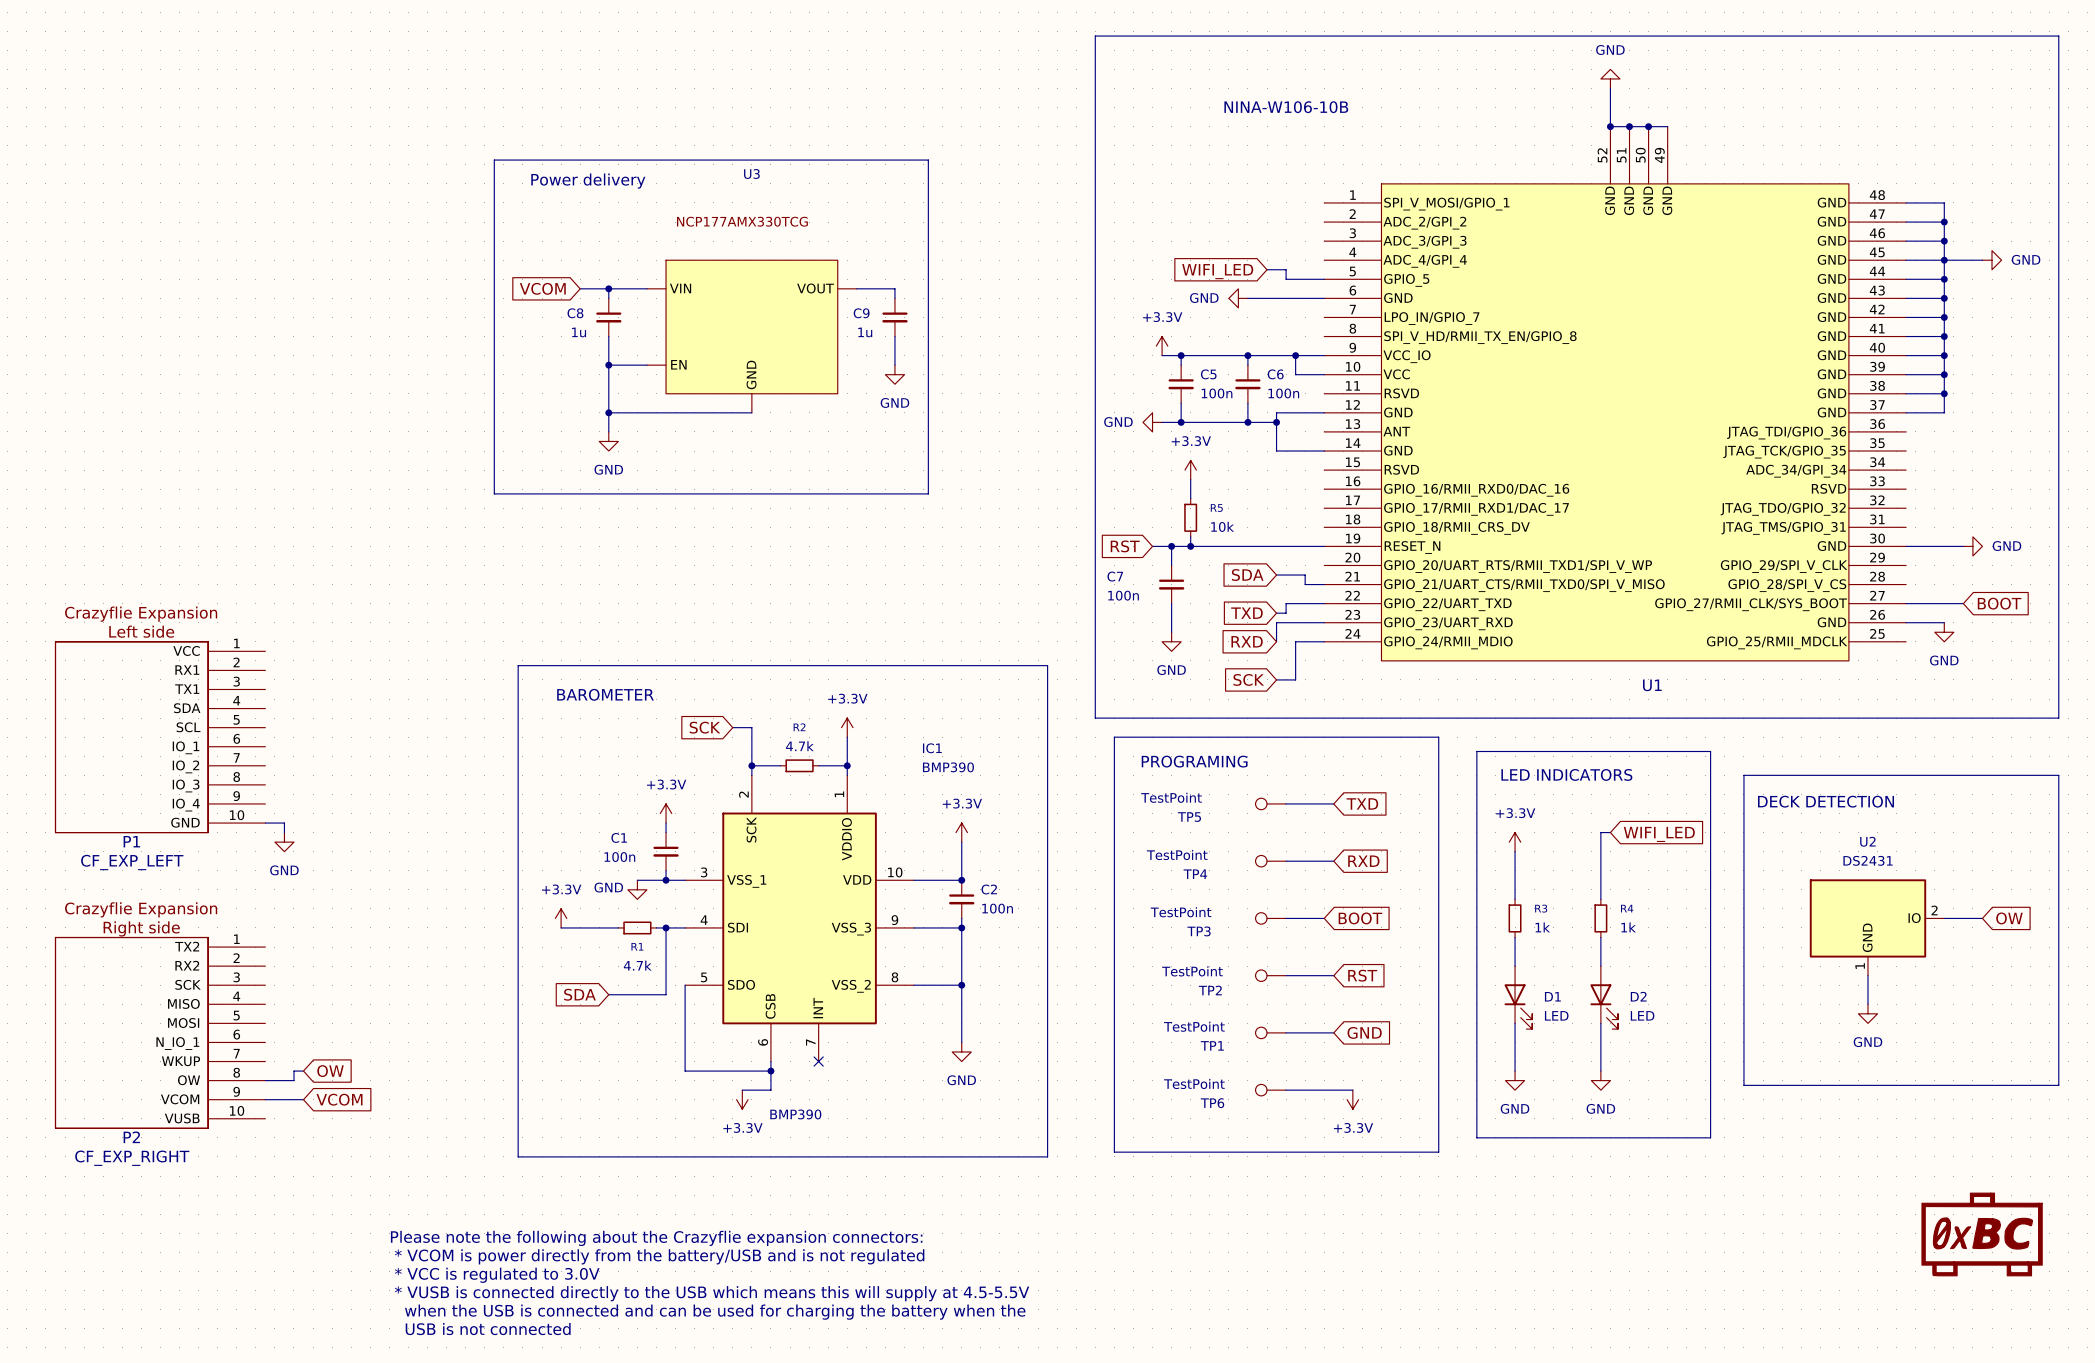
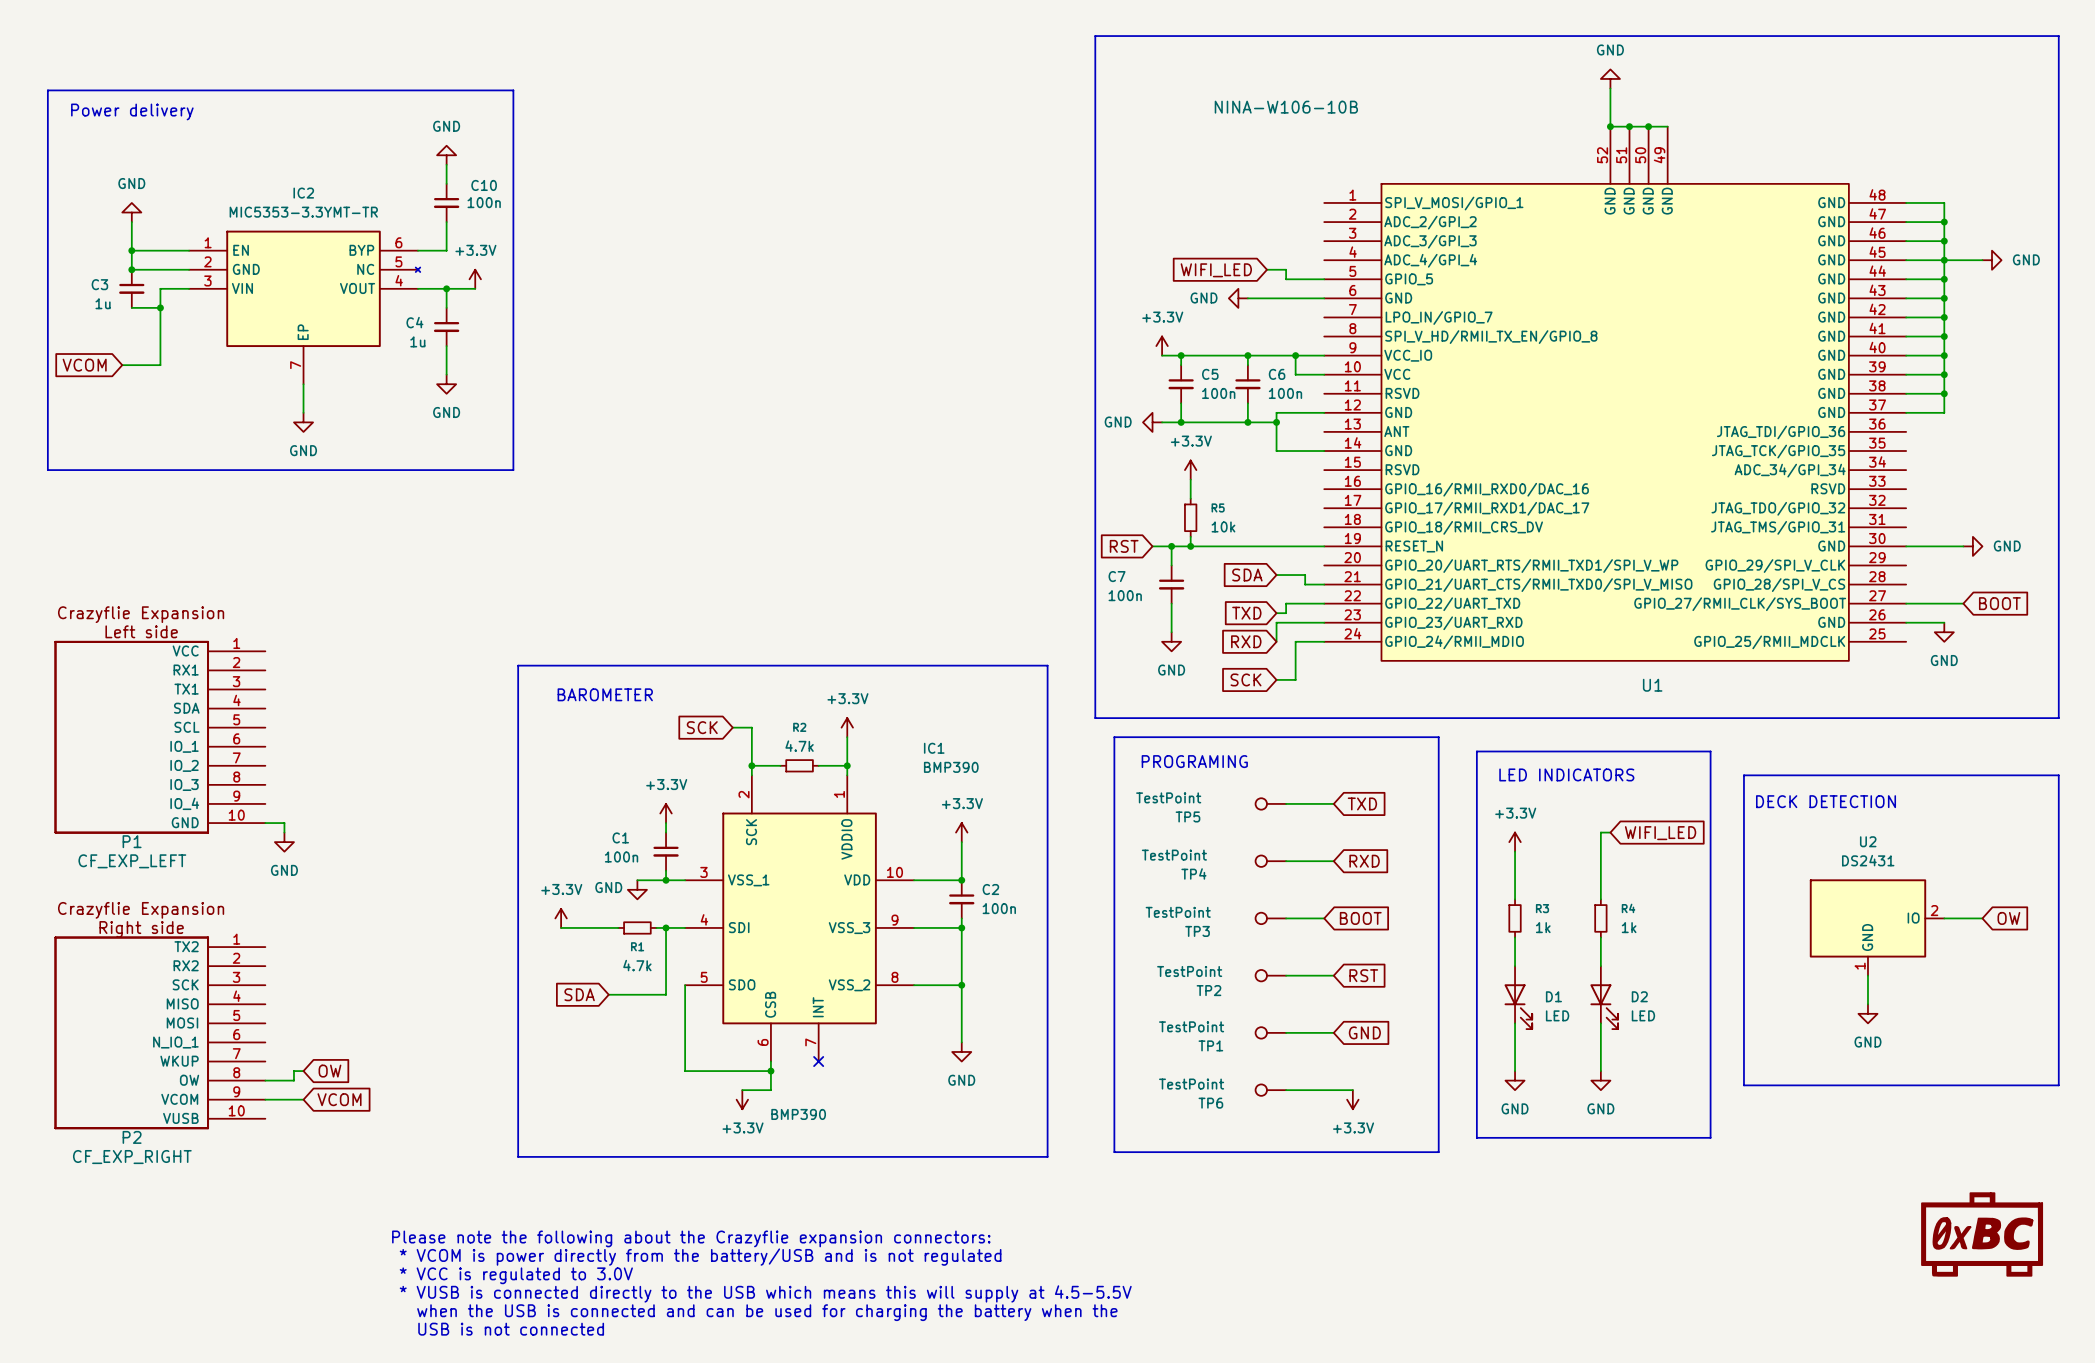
line: none -> (47, 90) (513, 90) (513, 470) (47, 470) (47, 90)
text: none -> Power delivery (132, 111)
power symbol: none -> GND (446, 155)
line: (494, 160) (928, 160) (928, 493) (494, 493) (494, 160) -> none
wire: none -> (446, 164) (446, 183)
text: Power delivery (588, 181) -> none
C10: none -> 100n (446, 202)
power symbol: none -> GND (131, 212)
wire: none -> (131, 222) (131, 269) (189, 269)
wire: none -> (446, 222) (446, 250) (417, 250)
wire: none -> (131, 250) (189, 250)
junction: none -> (131, 250)
junction: none -> (131, 269)
power symbol: none -> +3.3V (475, 279)
C3: none -> 1u (131, 288)
wire: none -> (189, 288) (160, 288) (160, 365) (122, 365)
wire: none -> (417, 288) (475, 288)
wire: none -> (446, 288) (446, 307)
junction: none -> (446, 288)
global label: VCOM (542, 288) -> none
wire: (580, 288) (646, 288) -> none
wire: (608, 288) (608, 298) -> none
junction: (608, 288) -> none
wire: (856, 288) (894, 288) (894, 298) -> none
wire: none -> (131, 307) (160, 307)
junction: none -> (160, 307)
IC2: none -> MIC5353-3.3YMT-TR (304, 307)
C8: 1u (608, 317) -> none
C9: 1u (894, 317) -> none
C4: none -> 1u (446, 326)
wire: (608, 336) (608, 431) -> none
U3: (751, 336) -> none
wire: (894, 336) (894, 365) -> none
wire: none -> (446, 346) (446, 374)
global label: none -> VCOM (84, 365)
wire: (608, 365) (646, 365) -> none
junction: (608, 365) -> none
power symbol: GND (894, 374) -> none
wire: none -> (303, 384) (303, 412)
power symbol: none -> GND (446, 384)
wire: (608, 412) (751, 412) -> none
junction: (608, 412) -> none
power symbol: none -> GND (303, 422)
power symbol: GND (608, 441) -> none

